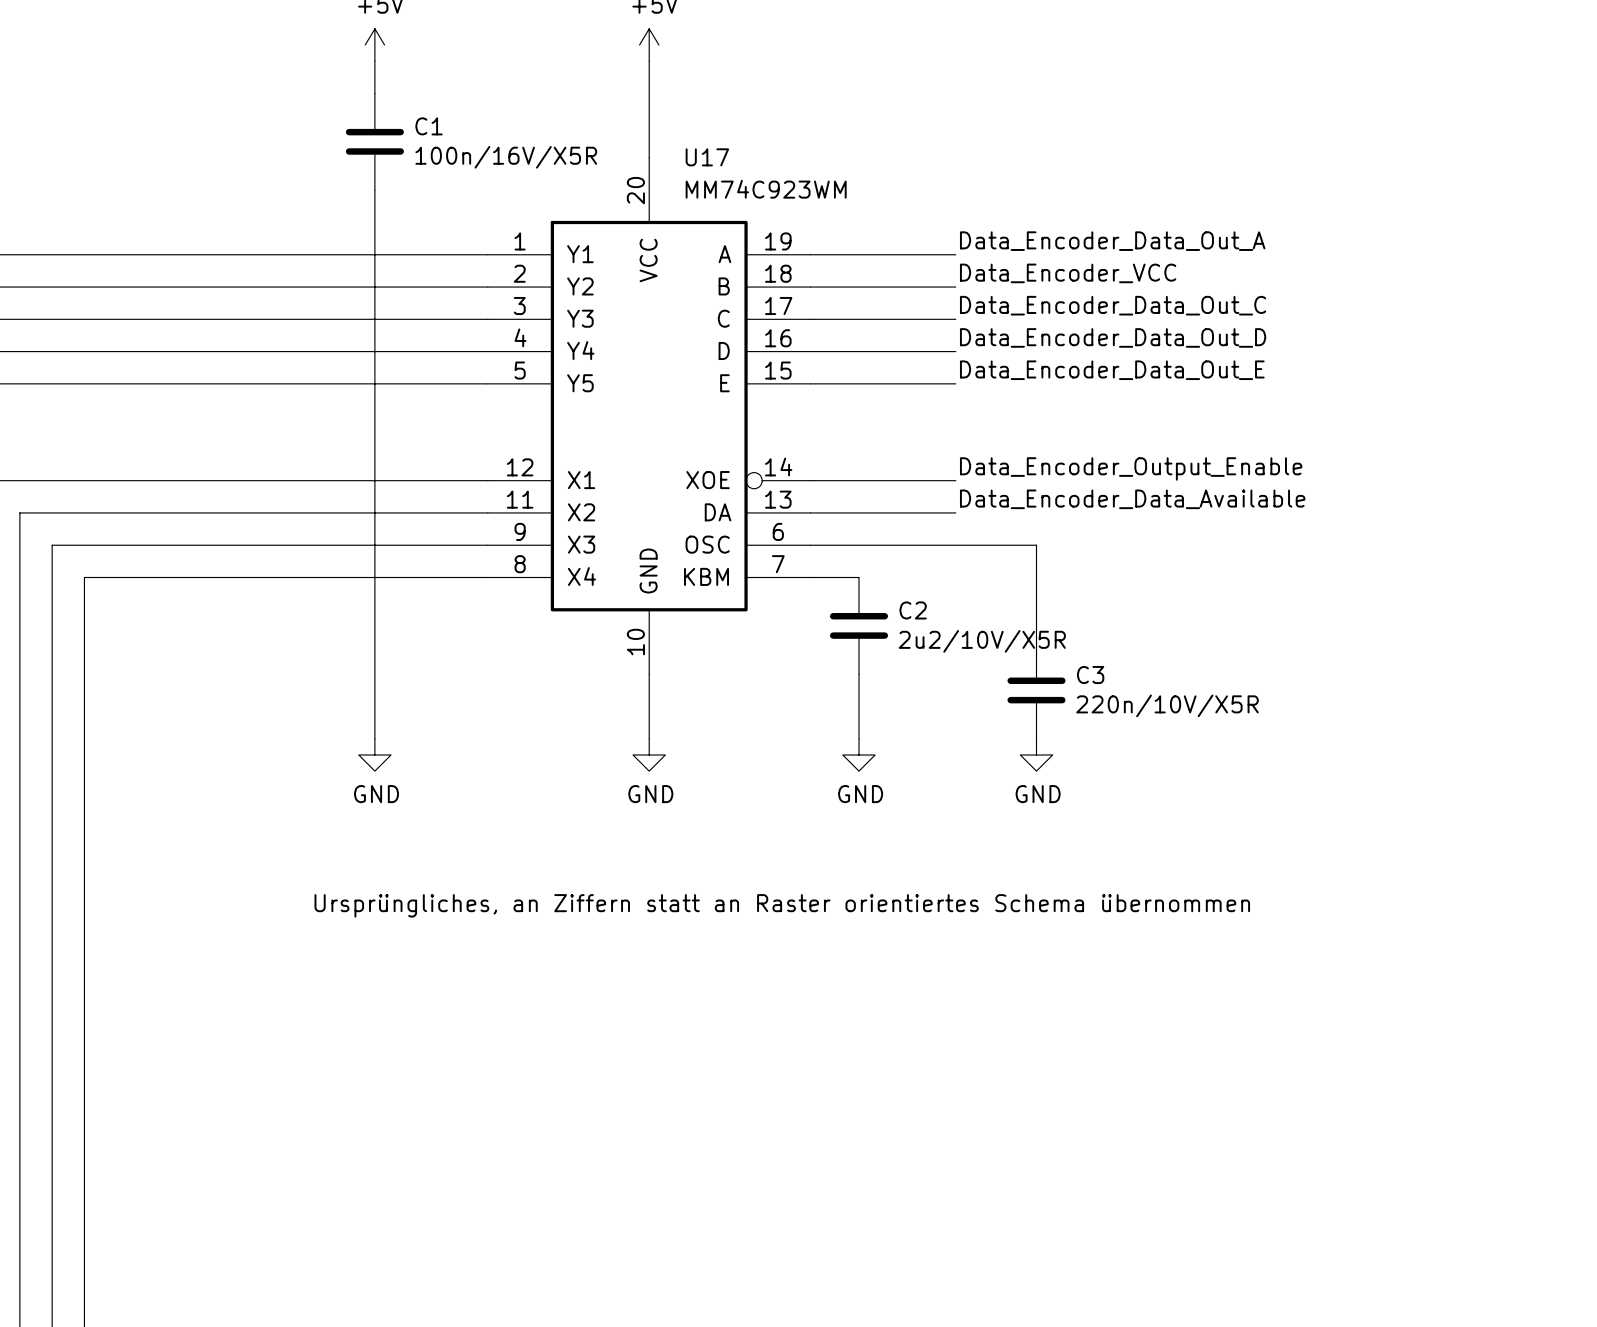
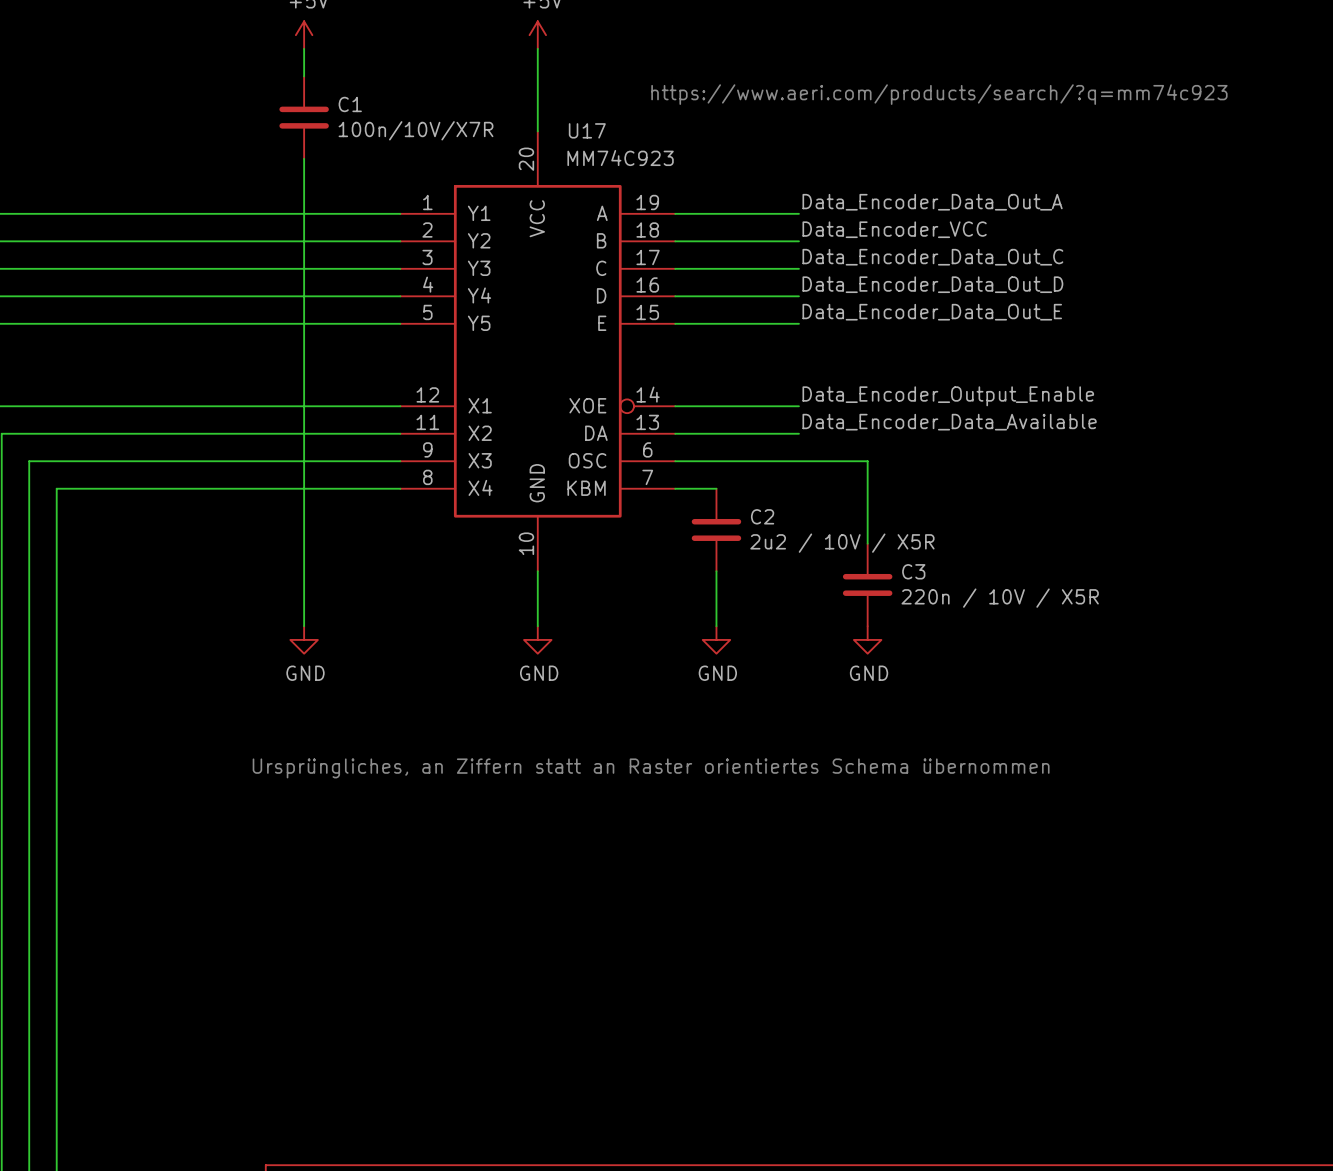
text: none -> https://www.aeri.com/products/search/?q=mm74c923 (939, 94)
C1 value: 100n/16V/X5R (506, 157) -> 100n/10V/X7R (416, 130)
U17 value: MM74C923WM (766, 189) -> MM74C923 (620, 158)
C2 value: 2u2/10V/X5R (982, 641) -> 2u2 / 10V / X5R (842, 543)
C3 value: 220n/10V/X5R (1167, 705) -> 220n / 10V / X5R (1000, 598)

